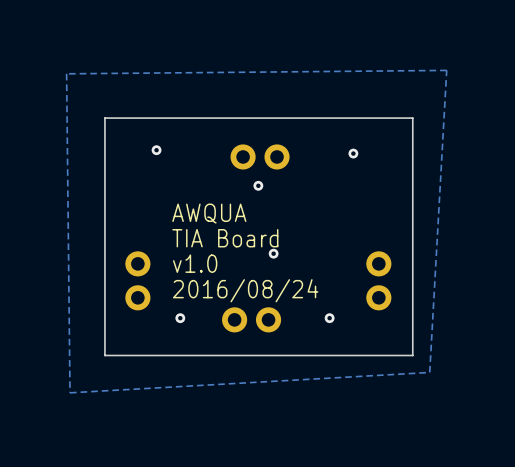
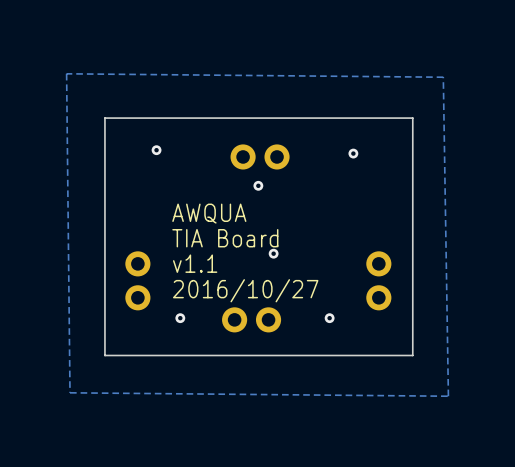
zone outline: (66, 73) (446, 70) (429, 372) (70, 392) -> (66, 73) (443, 77) (448, 396) (70, 392)
text: v1.0 (195, 263) -> v1.1 (195, 263)
text: 2016/08/24 (245, 290) -> 2016/10/27 (245, 290)

